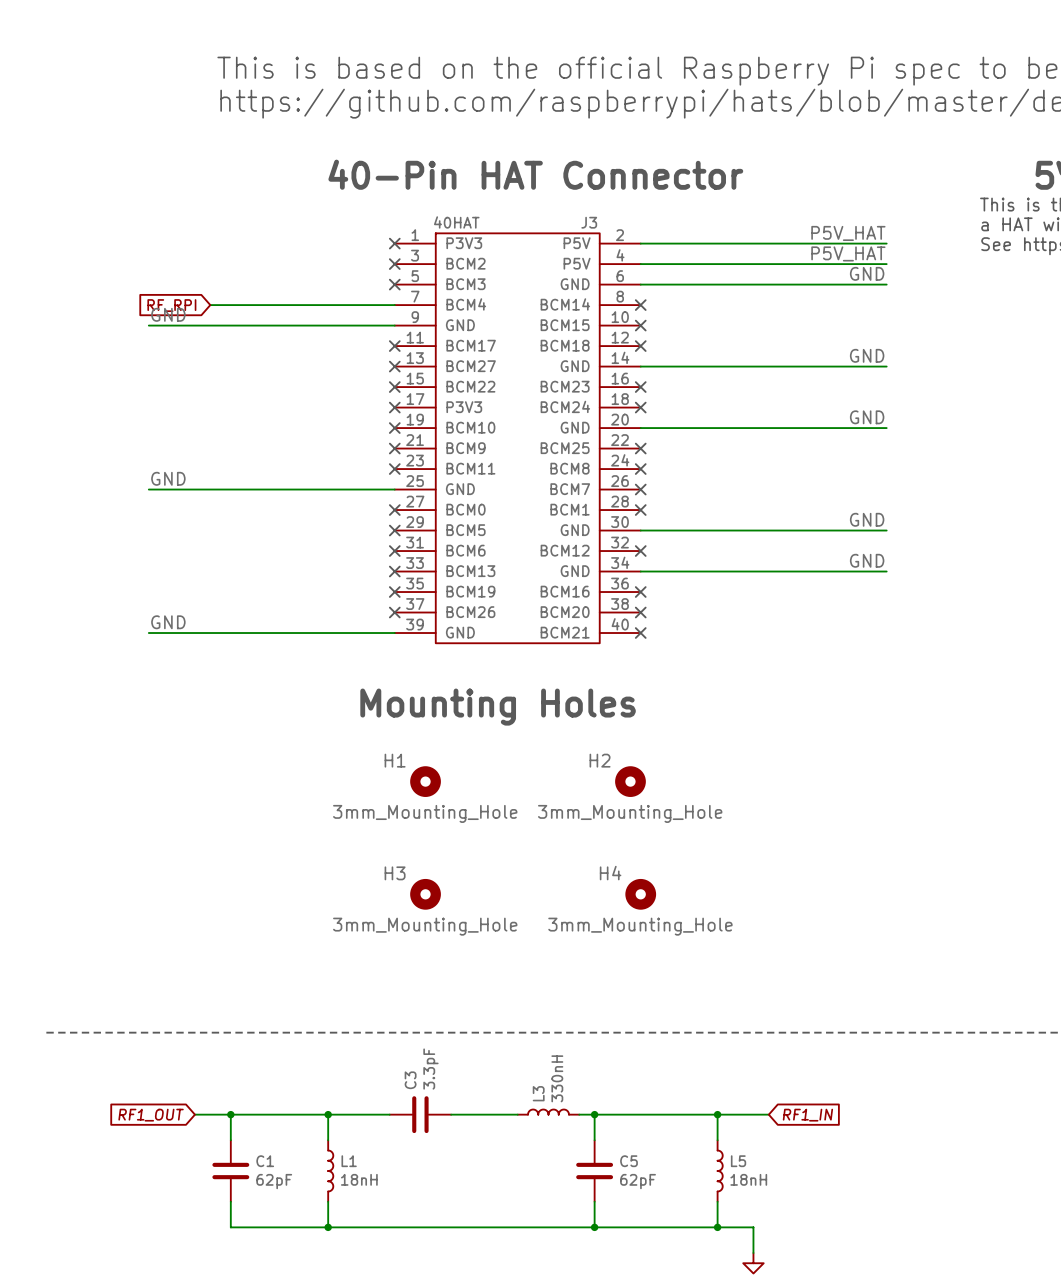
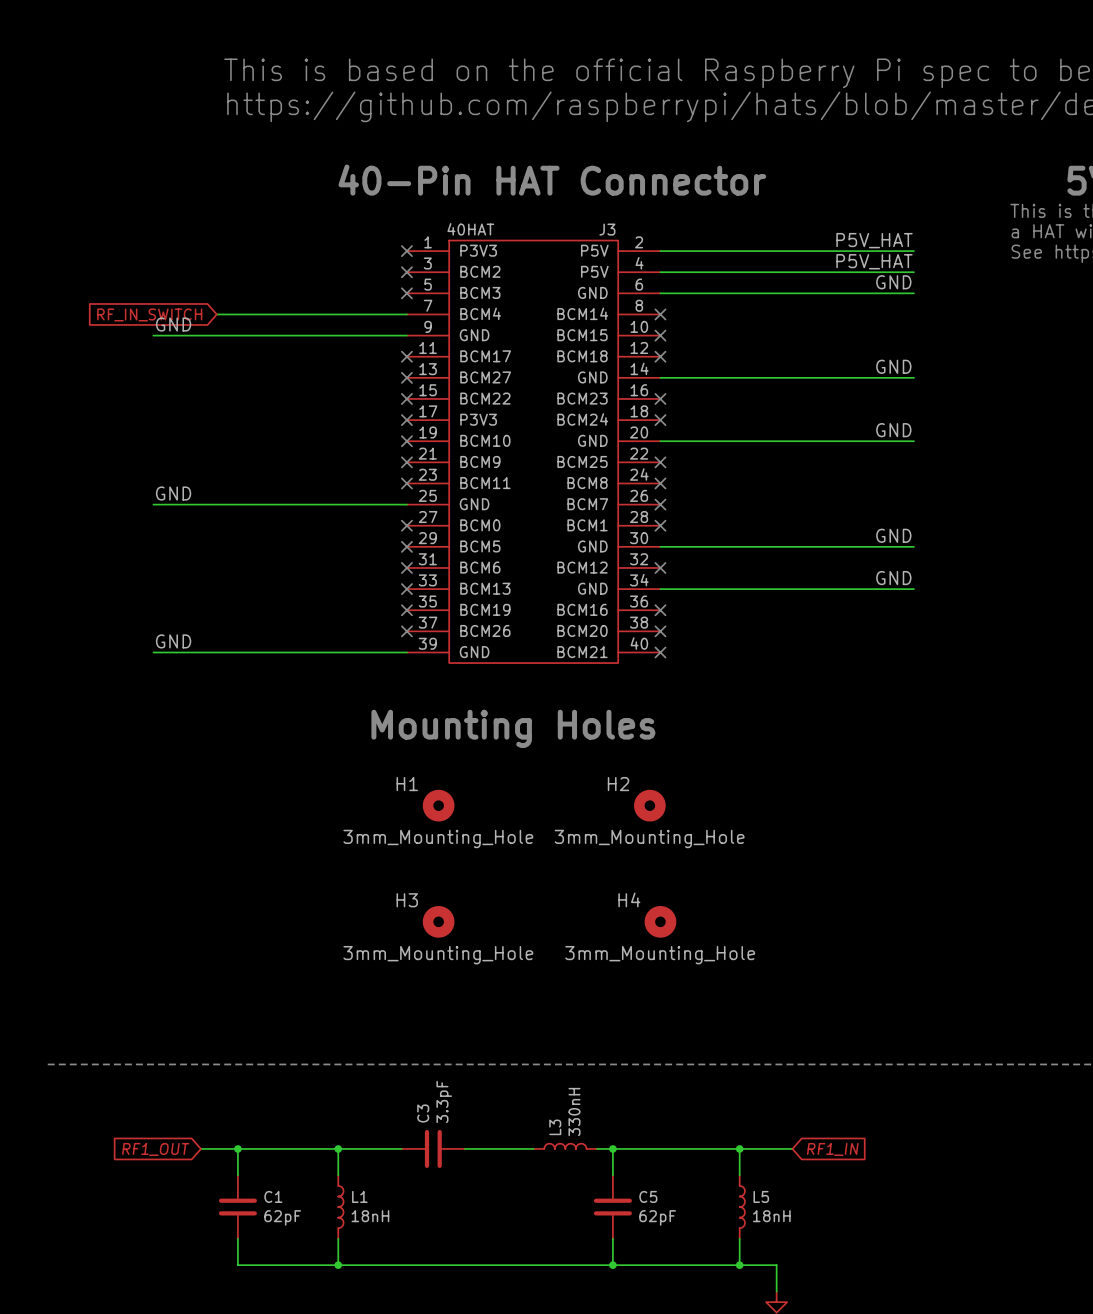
global label: RF_RPI (171, 305) -> RF_IN_SWITCH (149, 314)

